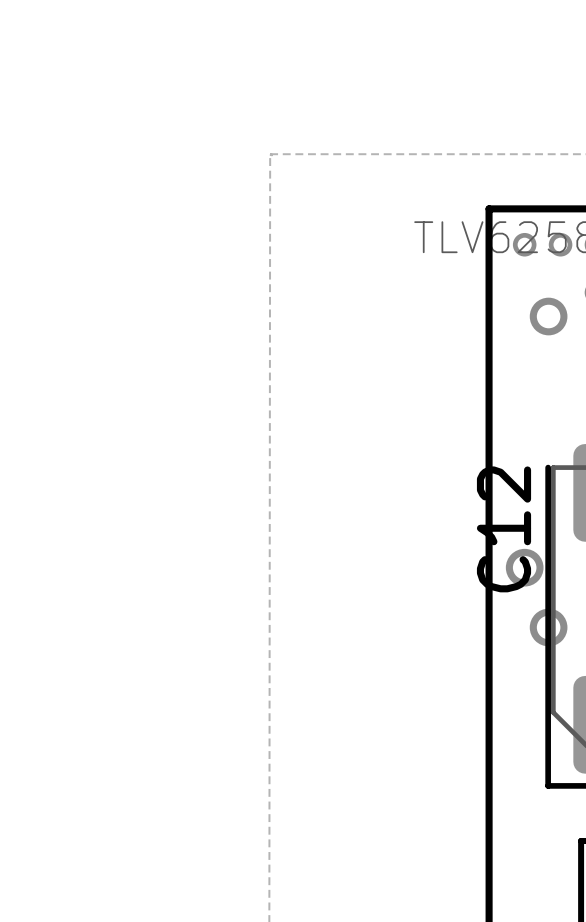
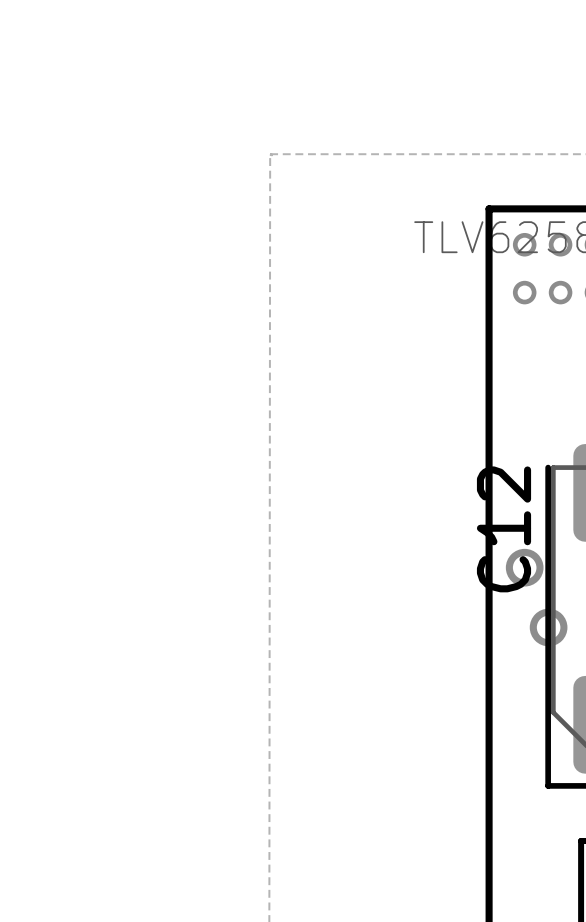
via: none -> (524, 292)
via: none -> (560, 292)
via: (548, 316) -> none

